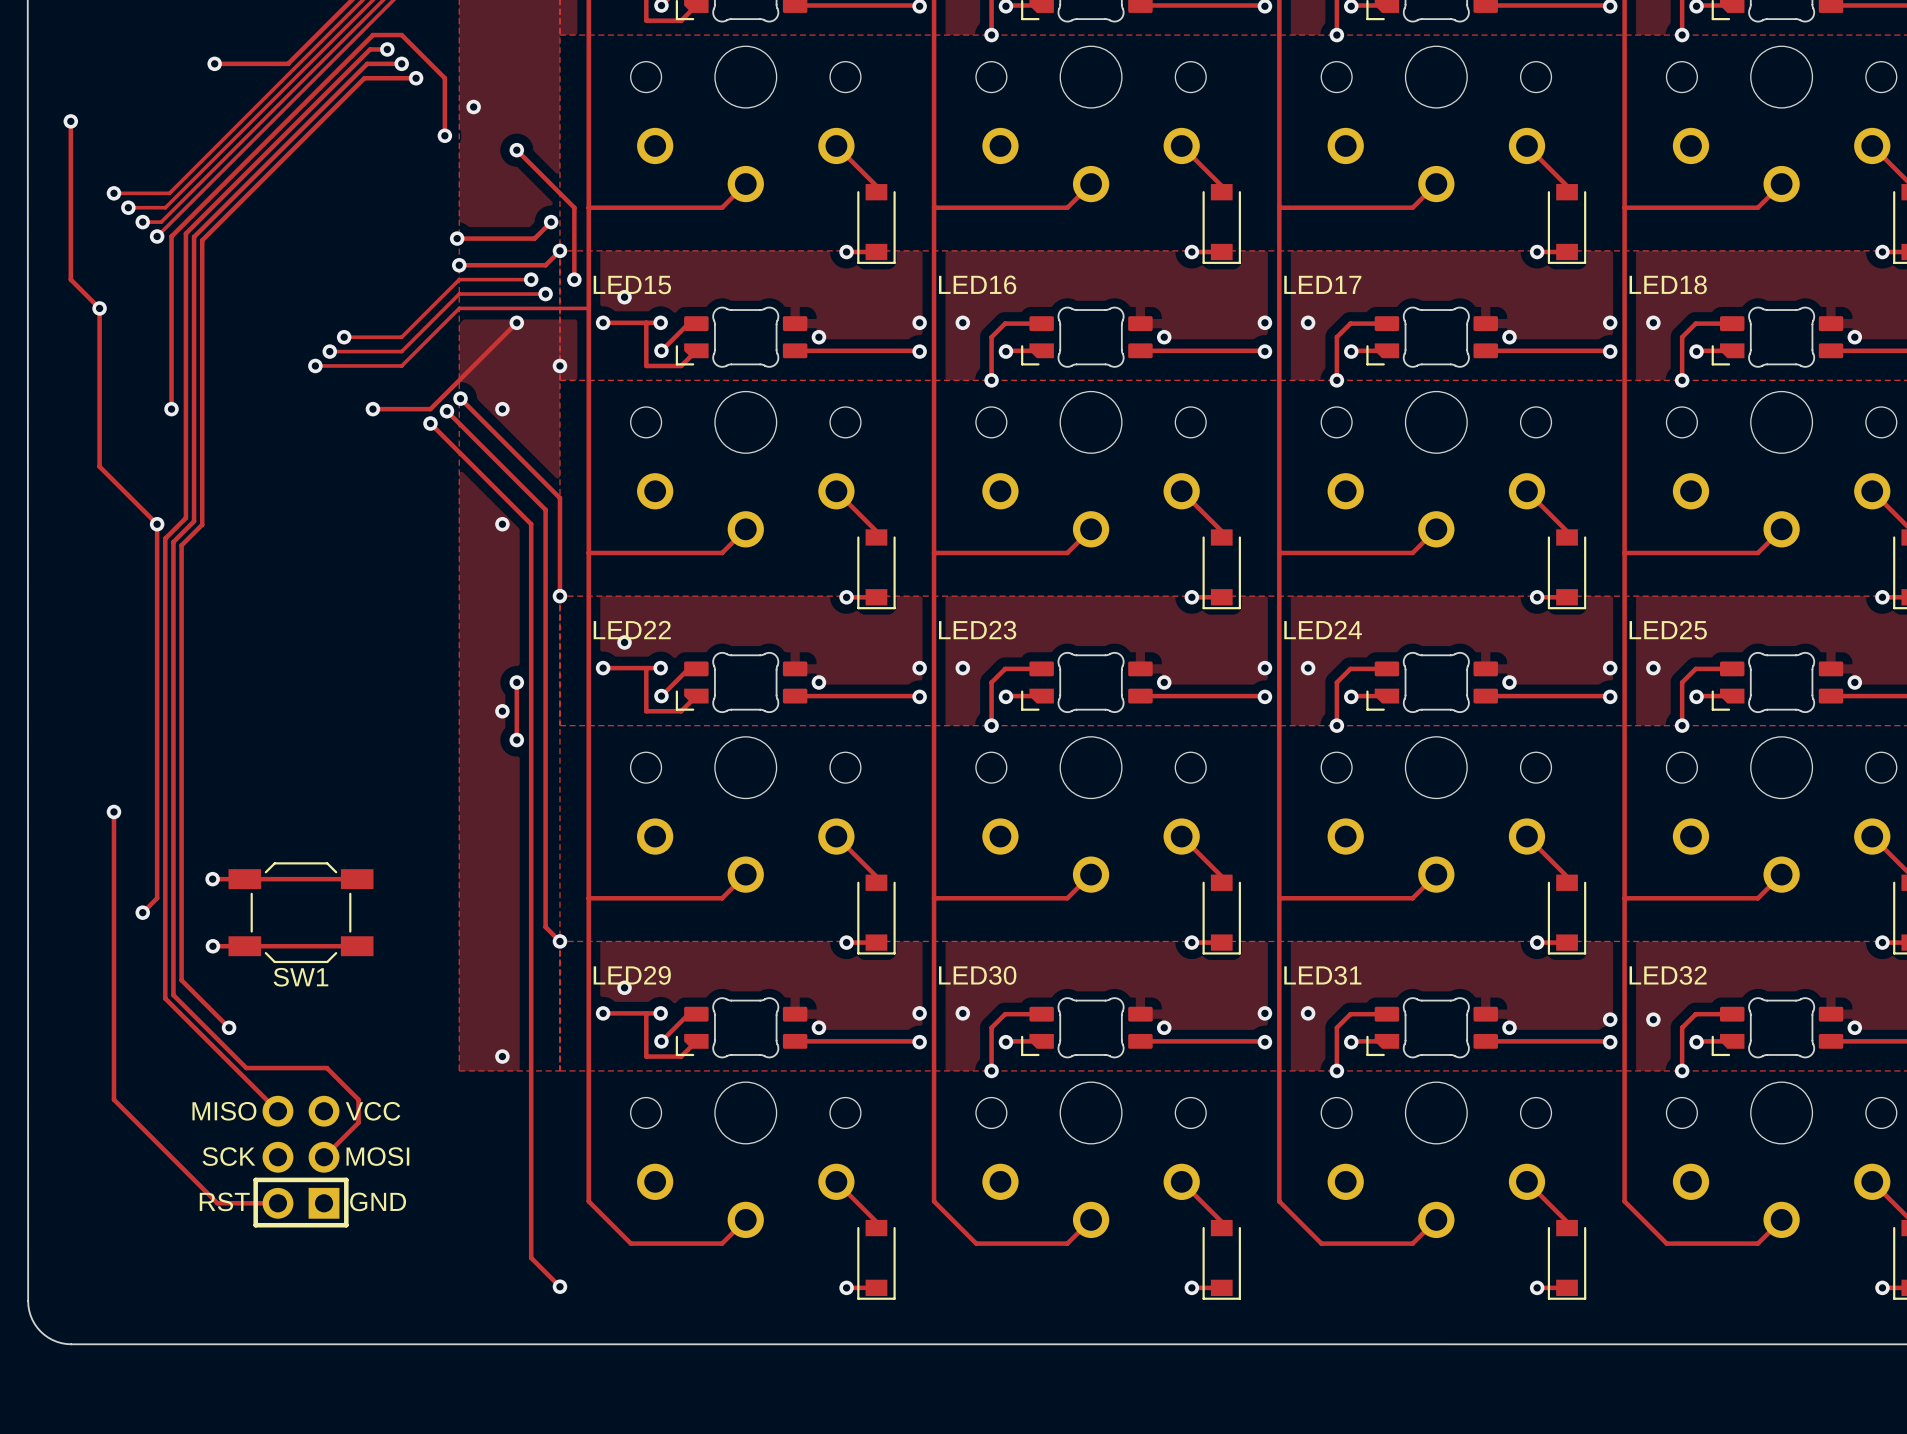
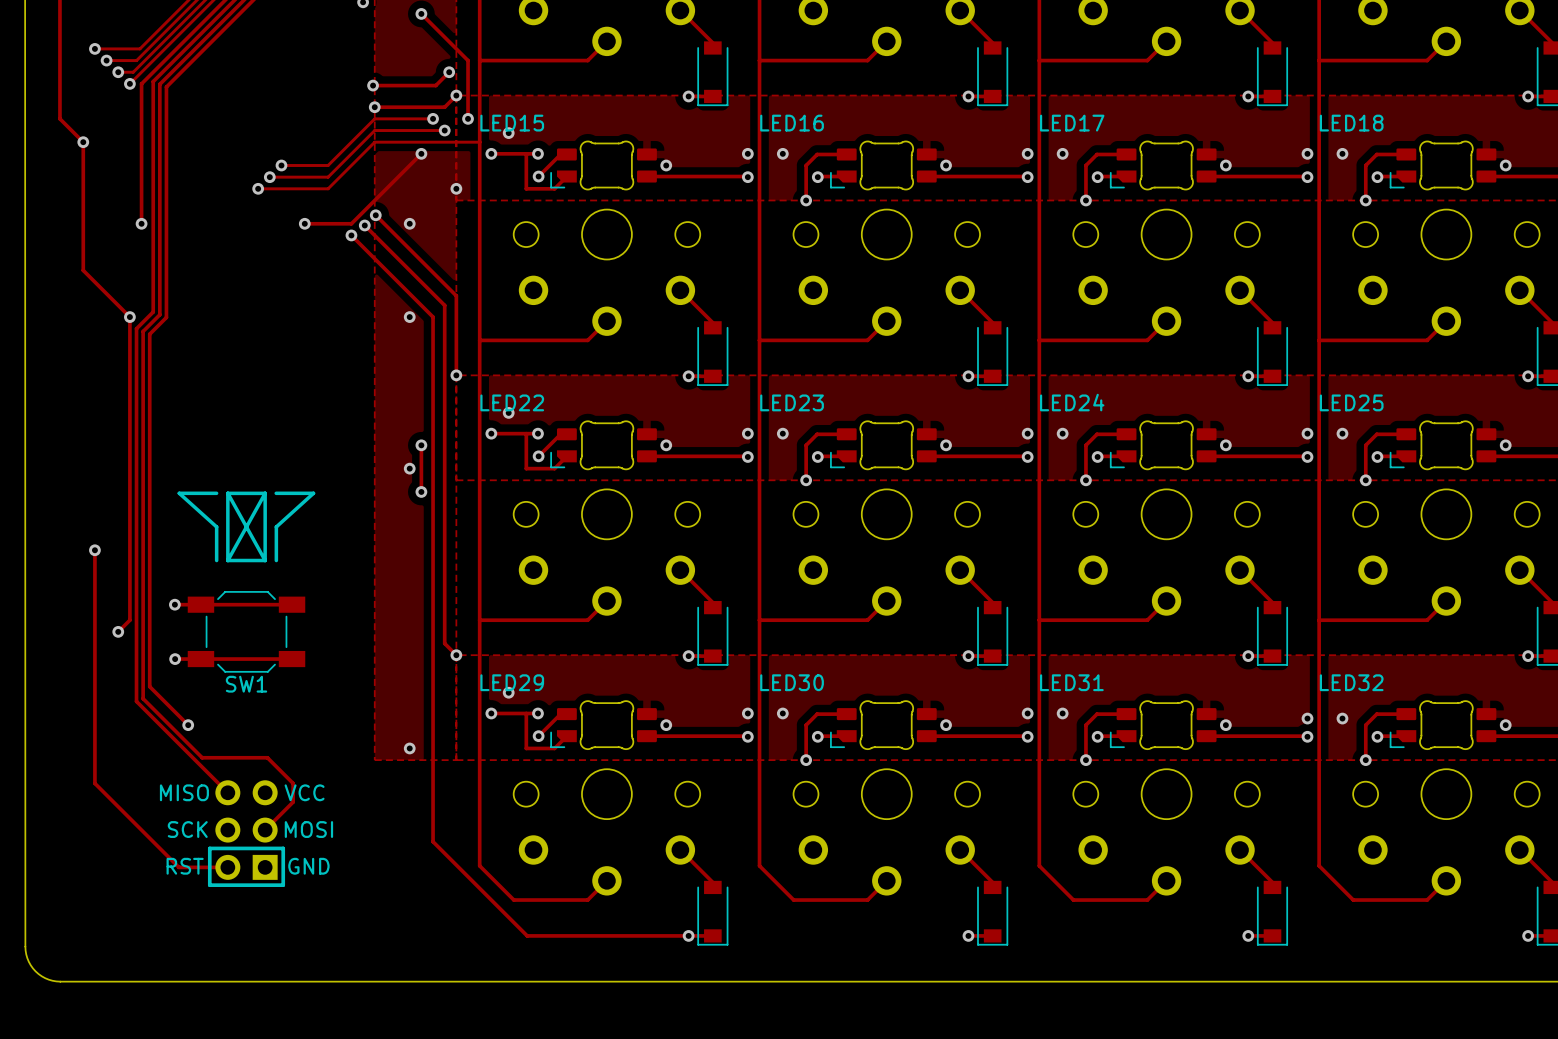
drawing: none -> [177, 491, 316, 563]
track: (531, 1171) (531, 1257) (559, 1286) -> (433, 841) (527, 935) (688, 935)
via: (559, 1286) -> none

